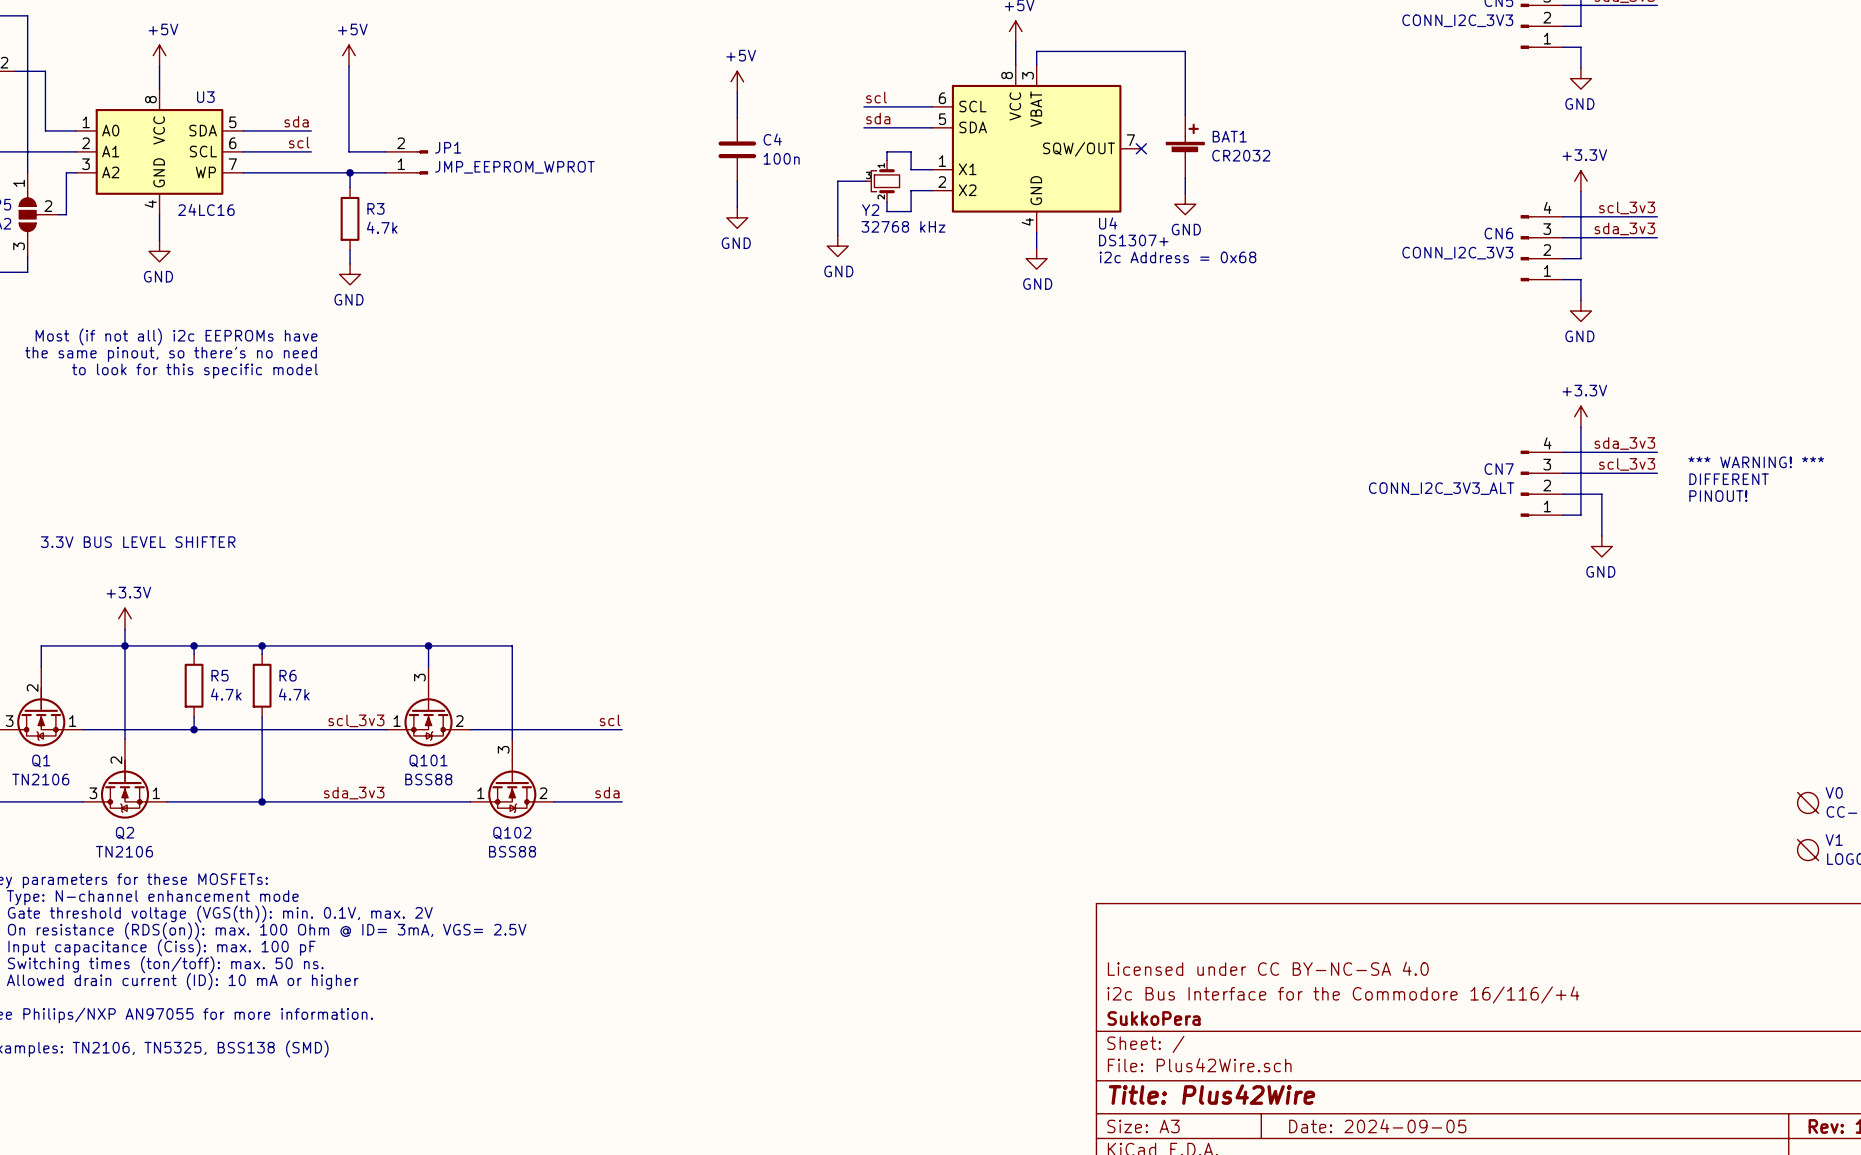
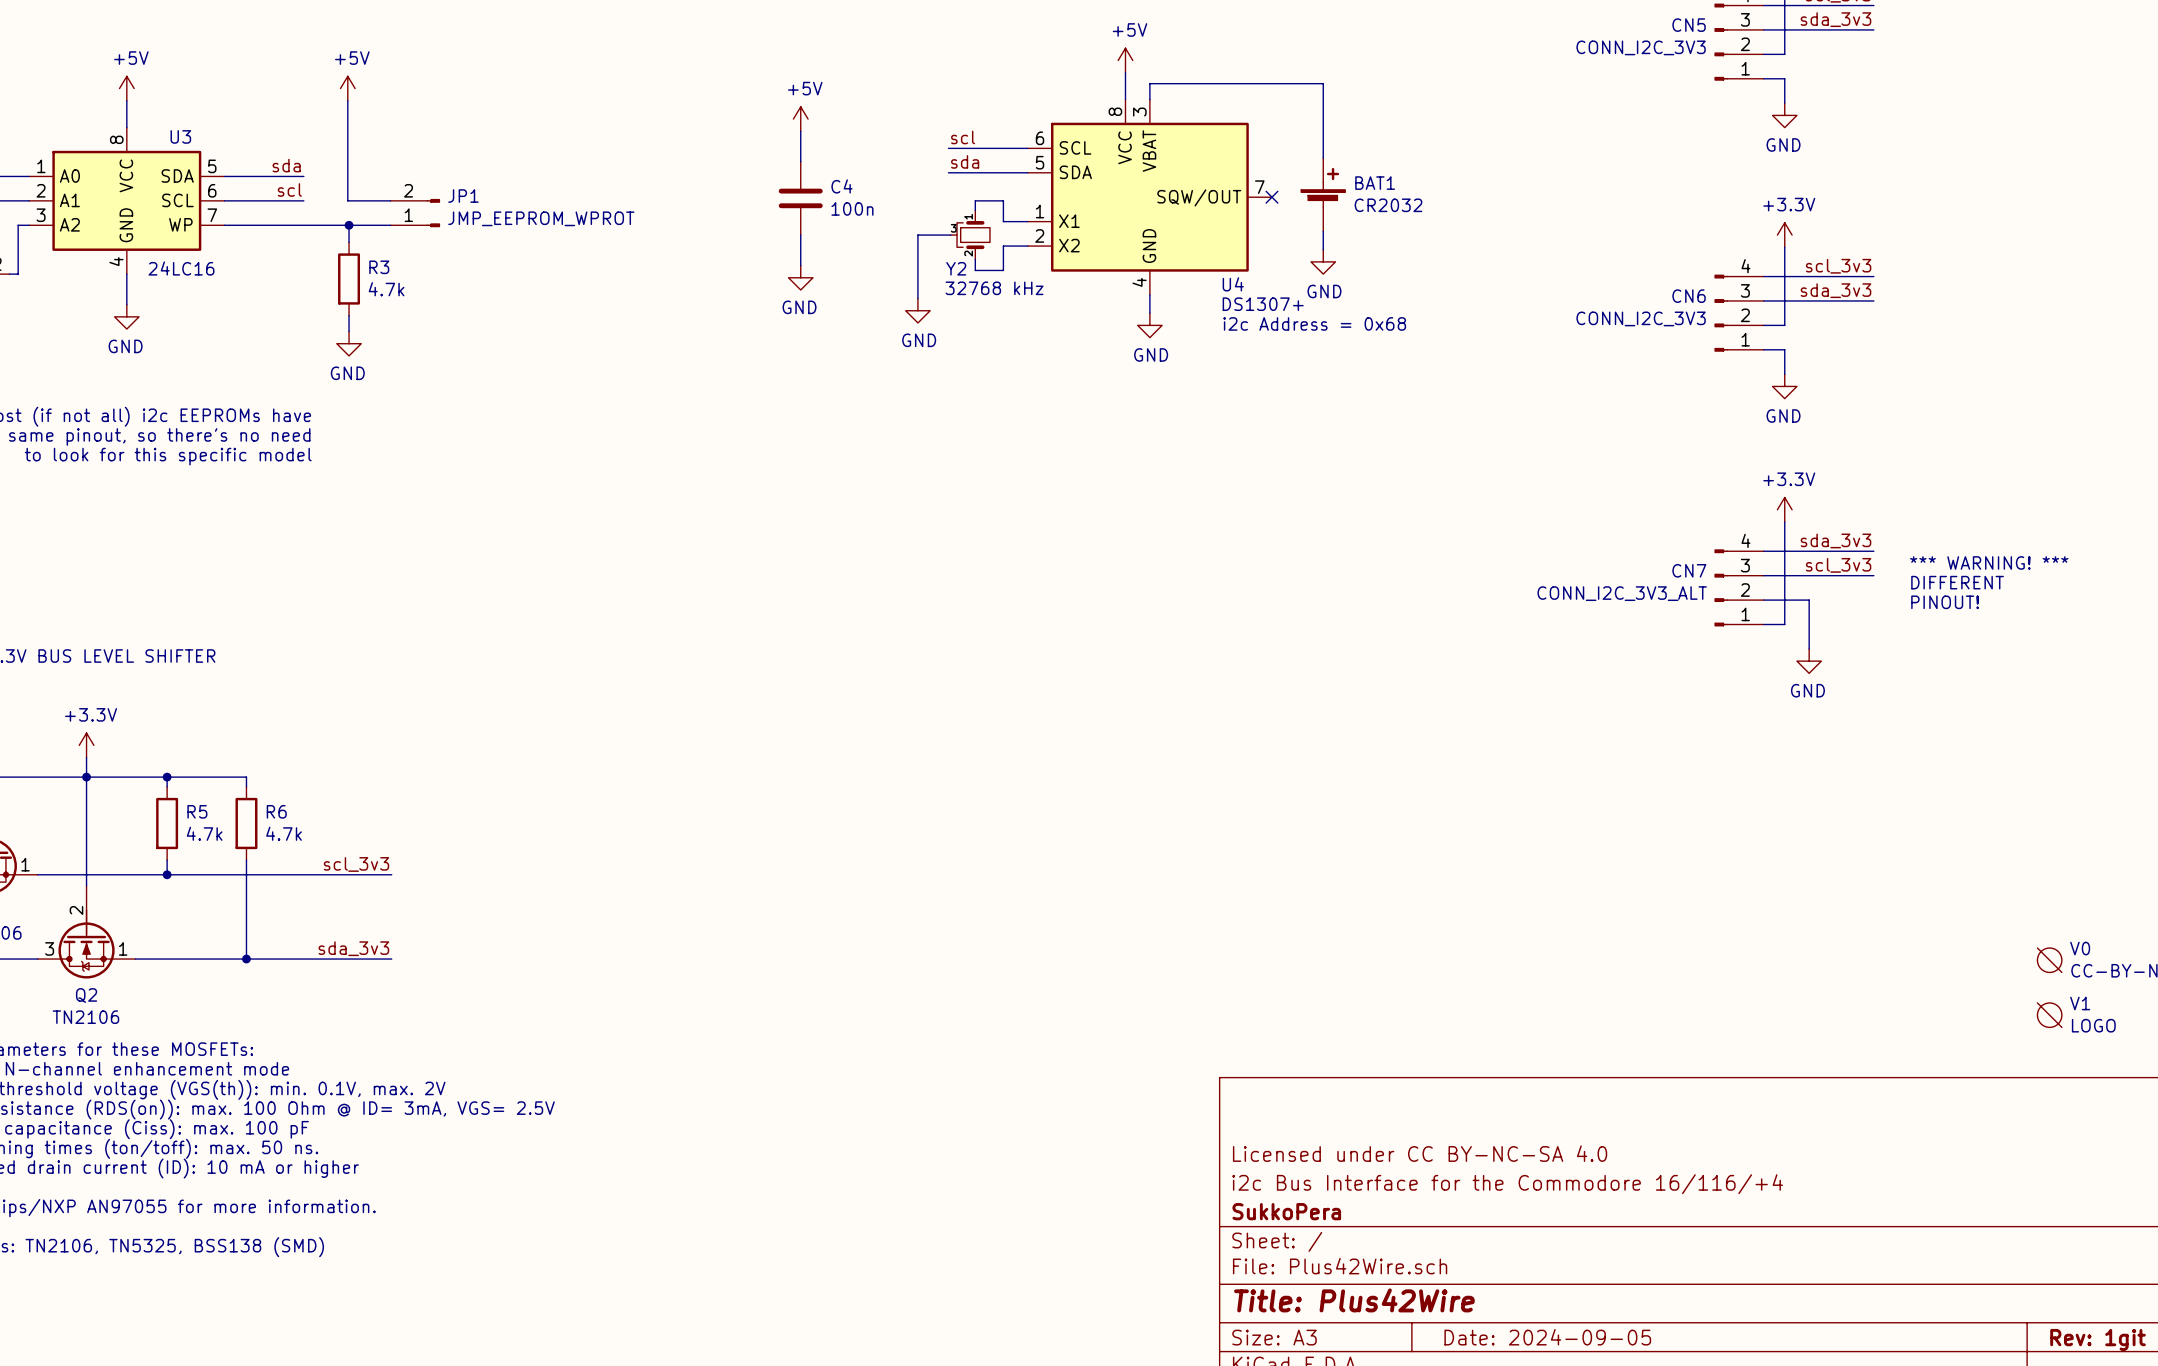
wire: (262, 645) (512, 645) (512, 739) -> none
junction: (262, 645) -> none
wire: (428, 645) (428, 666) -> none
junction: (428, 645) -> none
Q101: BSS88 (428, 706) -> none
label: scl (610, 720) -> none
wire: (470, 729) (622, 729) -> none
Q102: BSS88 (512, 778) -> none
label: sda (607, 792) -> none
wire: (386, 801) (470, 801) -> none
wire: (554, 801) (622, 801) -> none

